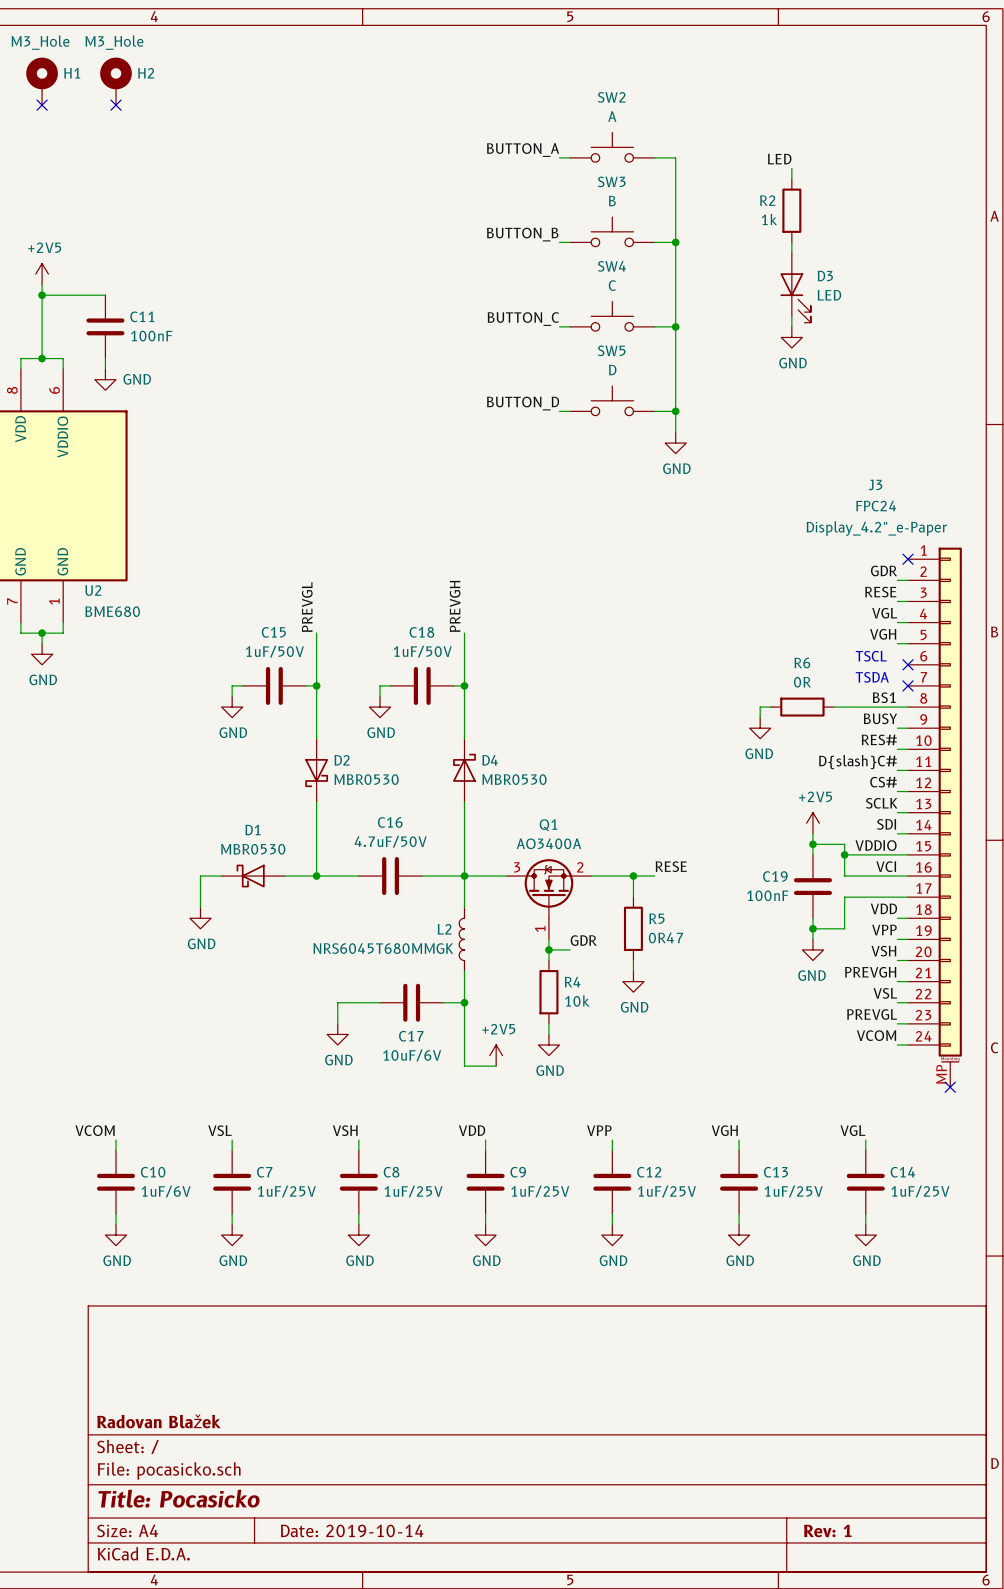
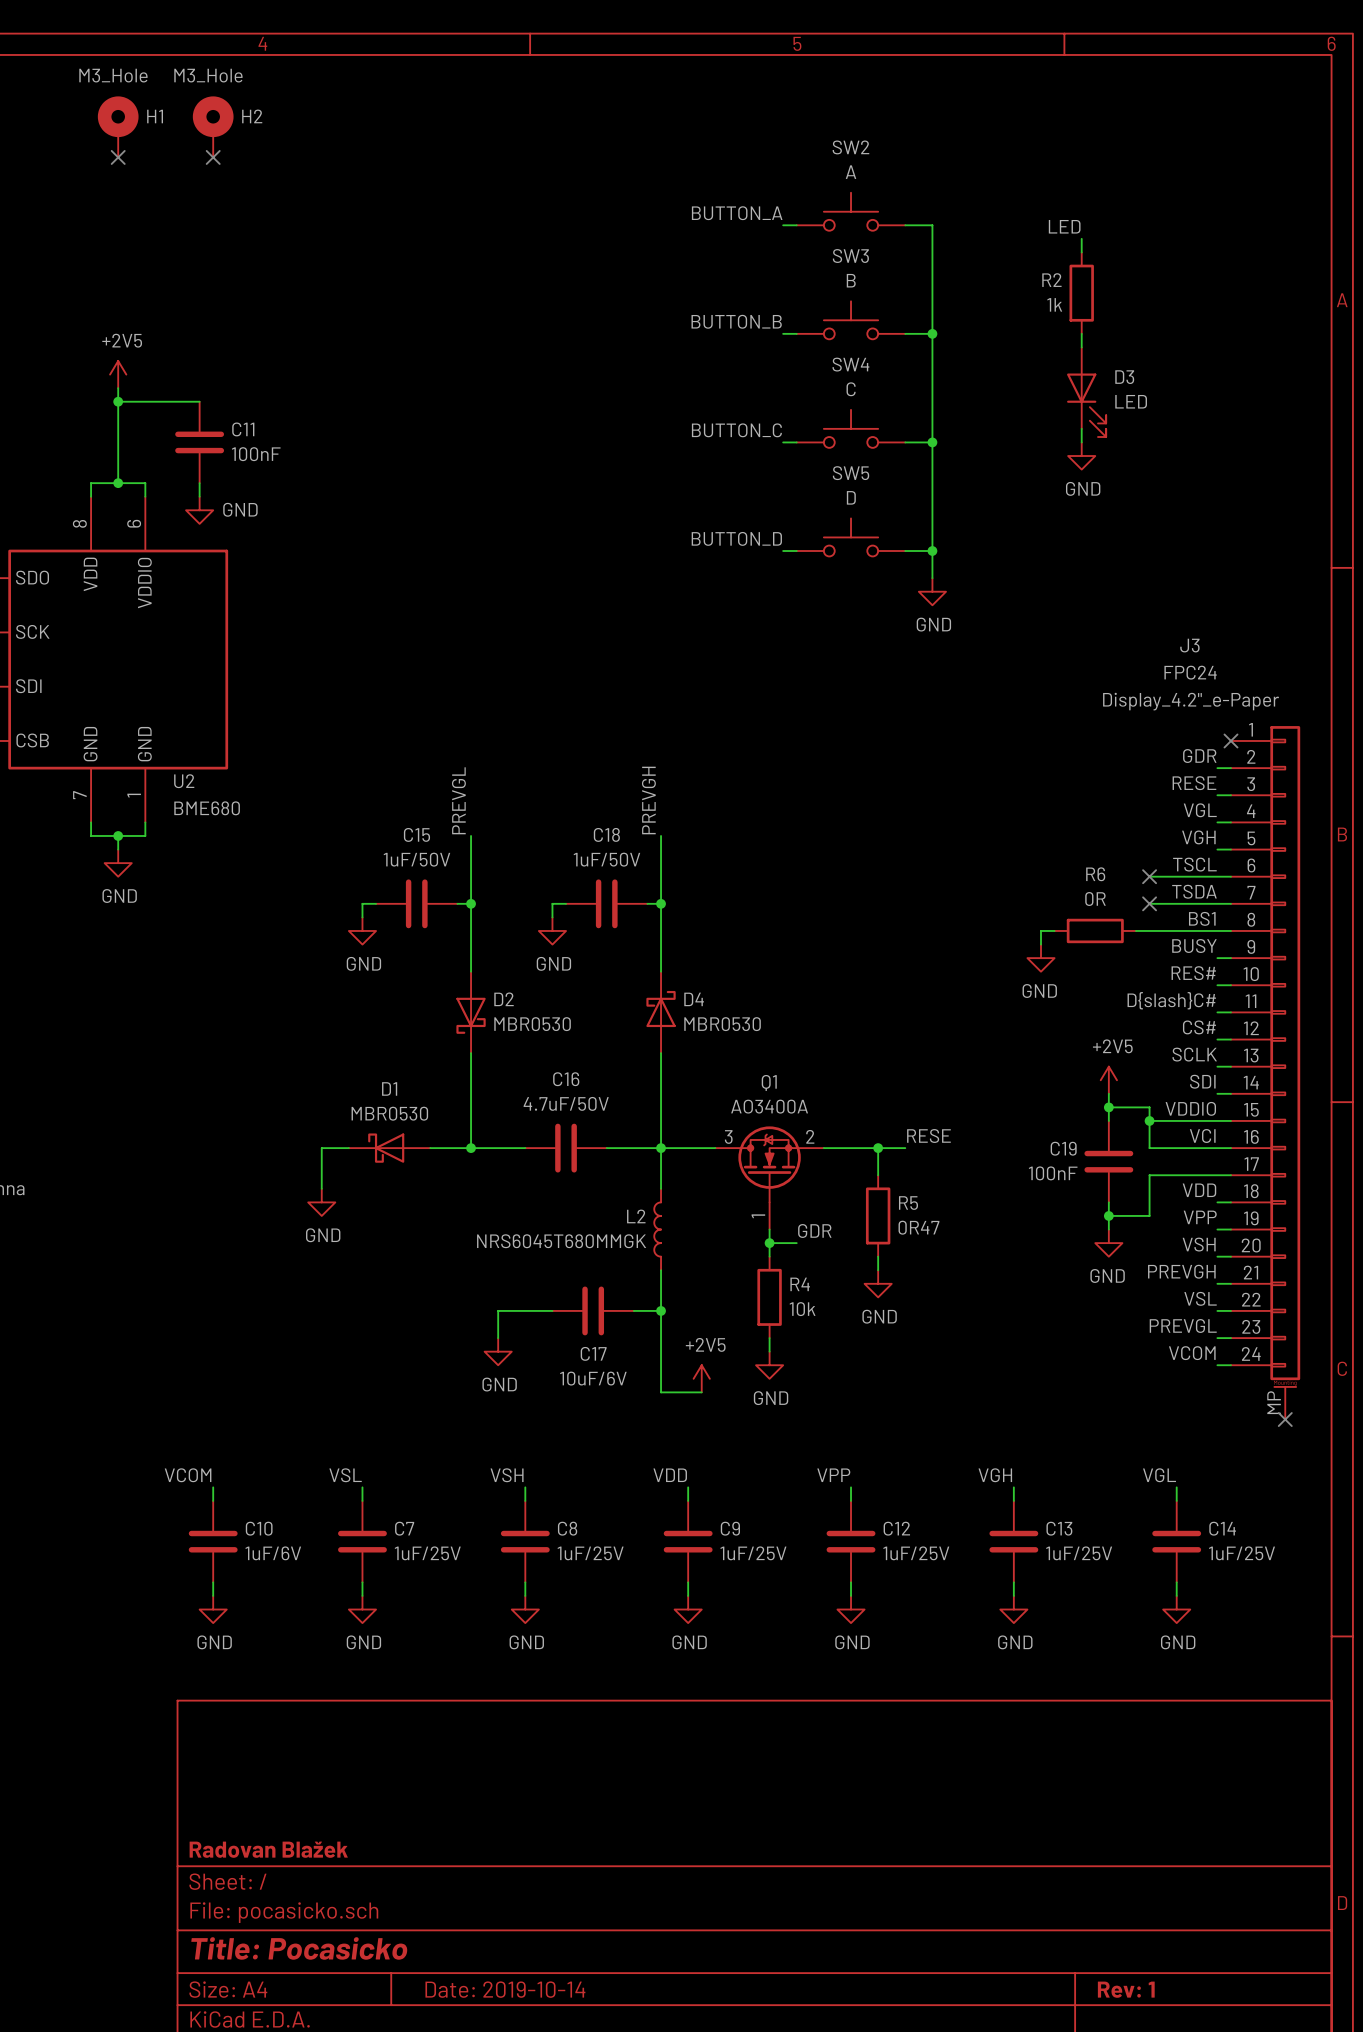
label: none -> TSCL (1194, 864)
text: TSCL (871, 656) -> none
wire: none -> (1149, 876) (1230, 876)
no-connect mark: none -> (1149, 876)
no-connect mark: (908, 664) -> none
label: none -> TSDA (1194, 891)
text: TSDA (872, 677) -> none
wire: none -> (1149, 903) (1230, 903)
no-connect mark: none -> (1149, 903)
no-connect mark: (908, 685) -> none

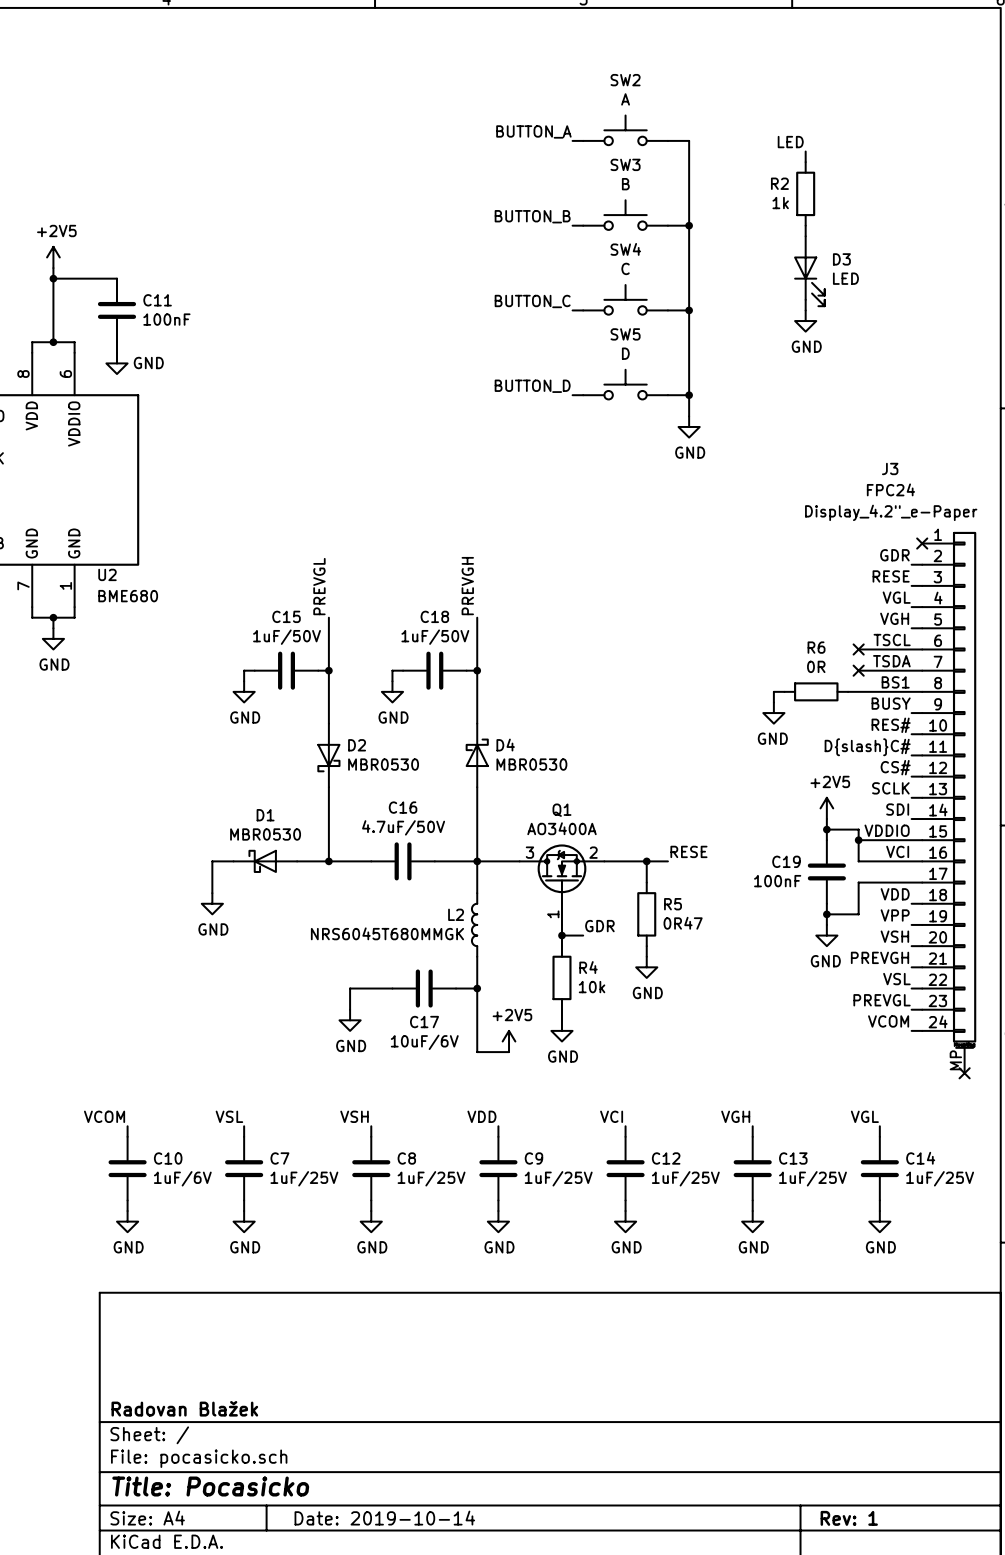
H1: M3_Hole (118, 126) -> none
H2: M3_Hole (213, 126) -> none
no-connect mark: (118, 157) -> none
no-connect mark: (213, 157) -> none
label: VPP (833, 1475) -> VCI (611, 1116)

